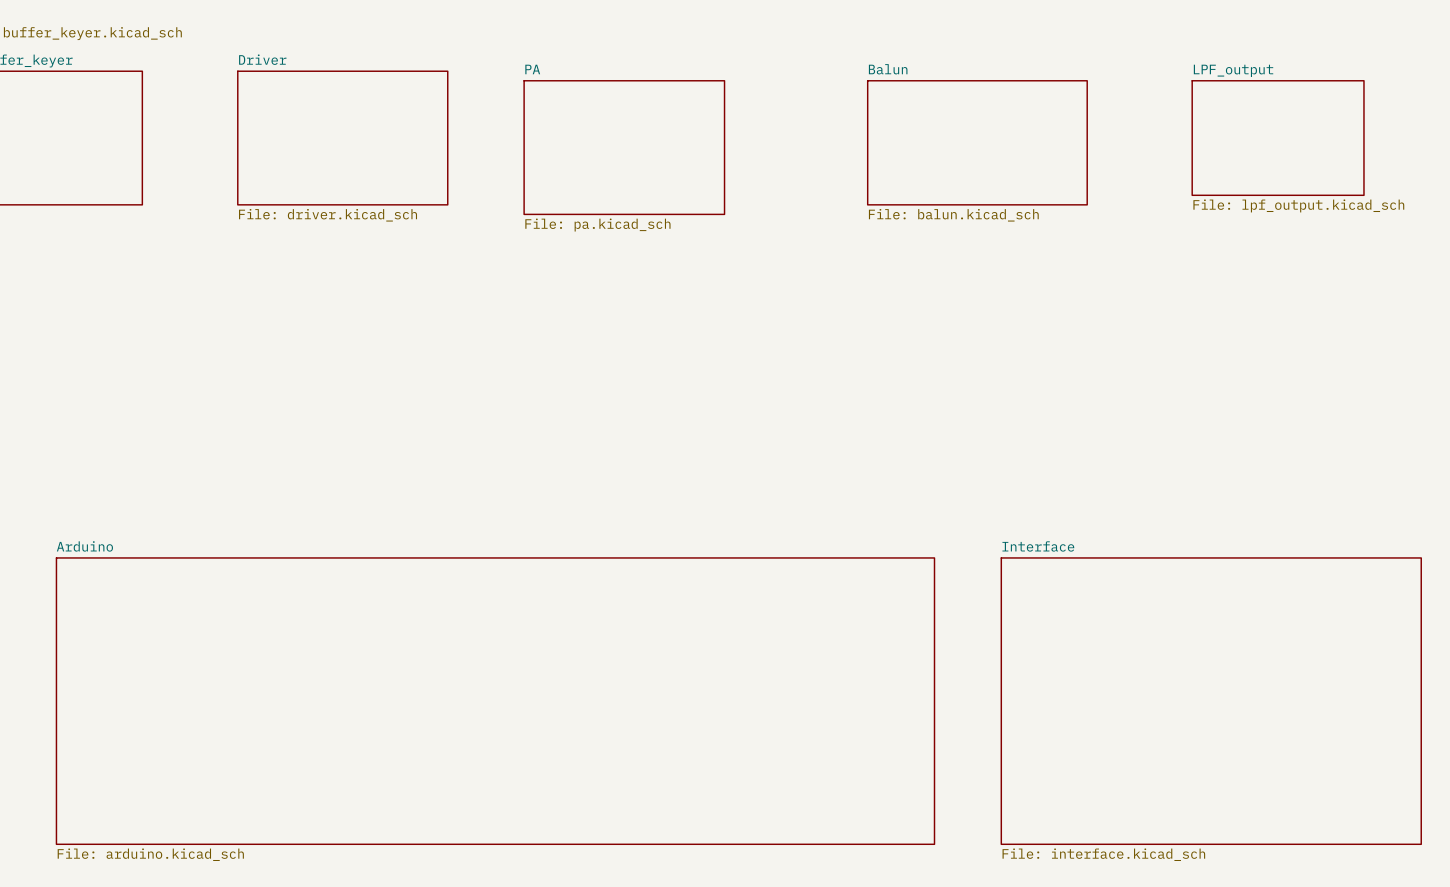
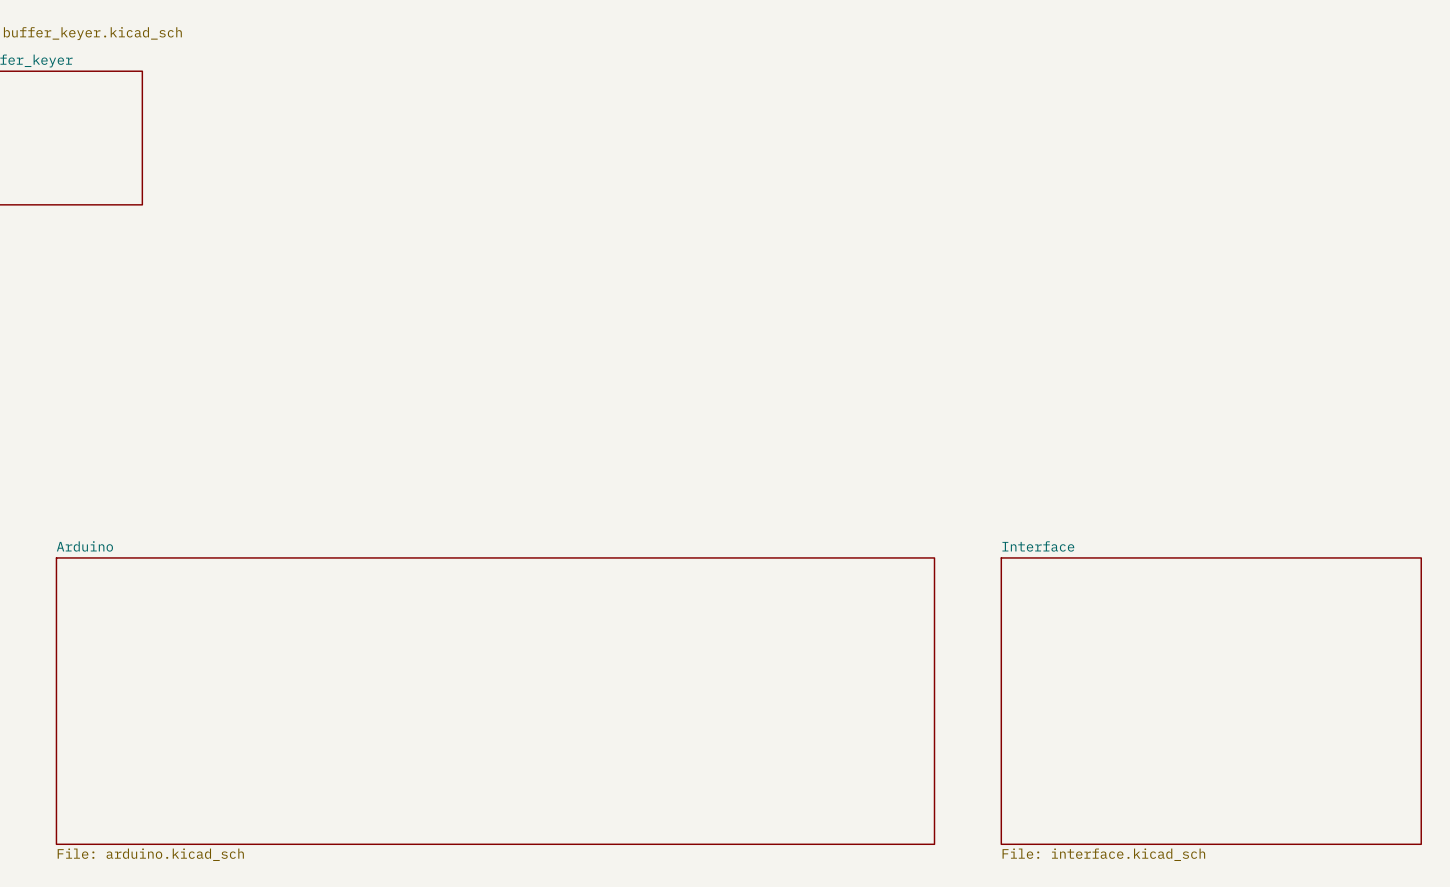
sheet Driver: File: driver.kicad_sch (342, 138) -> none
sheet LPF_output: File: lpf_output.kicad_sch (1278, 138) -> none
sheet Balun: File: balun.kicad_sch (977, 142) -> none
sheet PA: File: pa.kicad_sch (624, 147) -> none

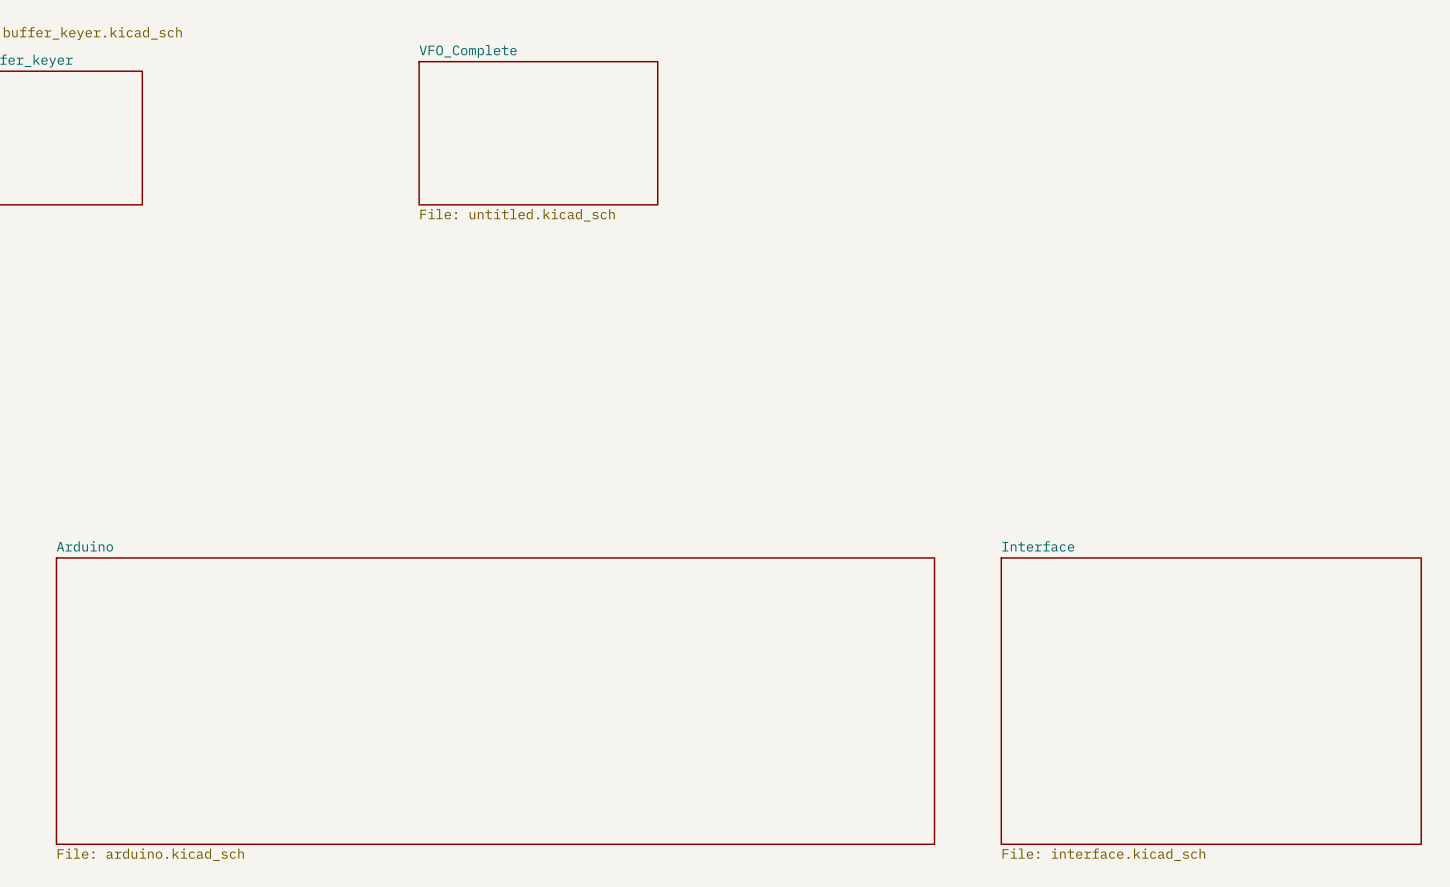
sheet VFO_Complete: none -> File: untitled.kicad_sch (538, 133)

